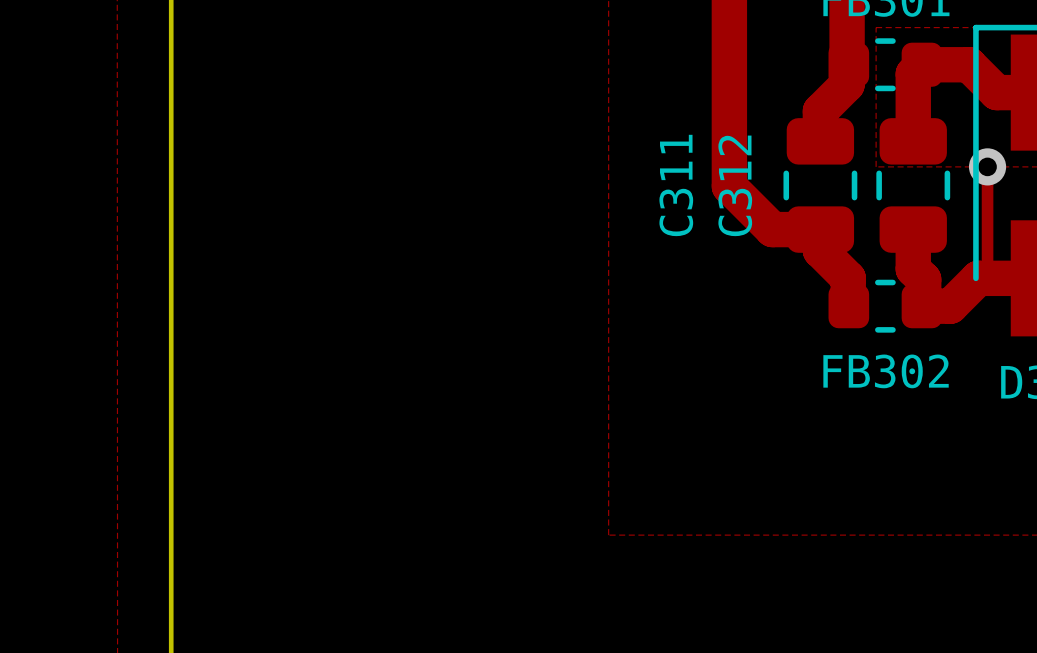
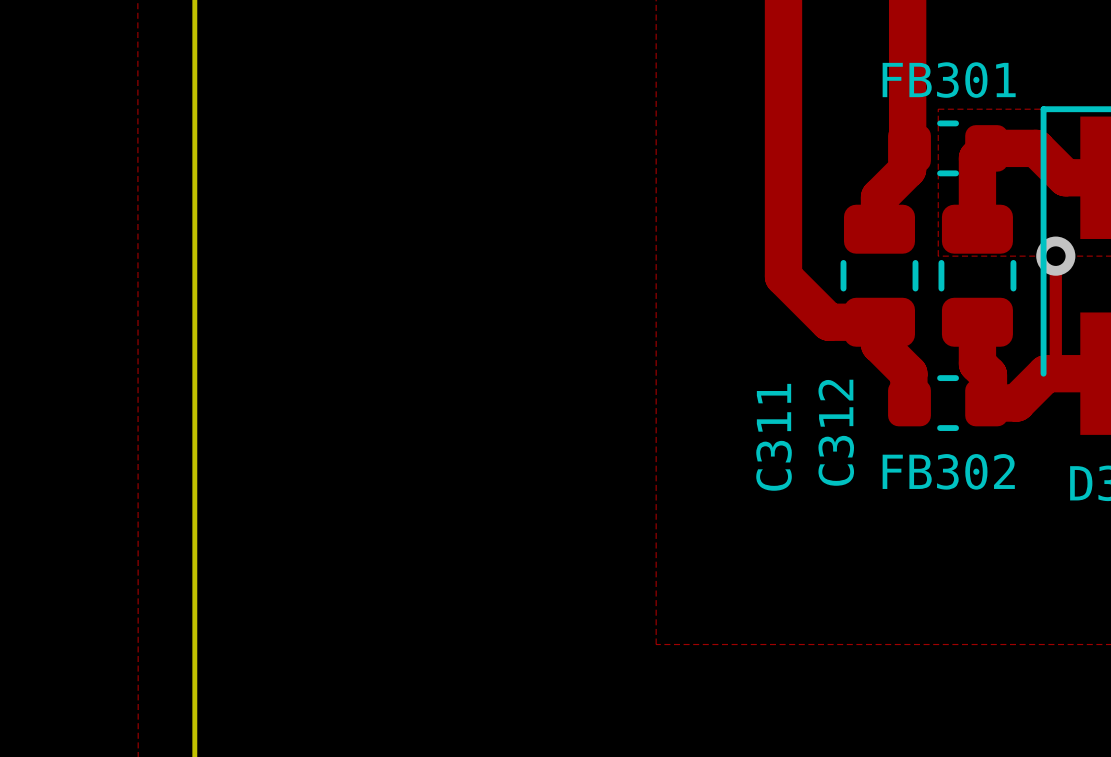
C311 name position: C311 (676, 185) -> C311 (774, 437)
C312 name position: C312 (735, 185) -> C312 (836, 432)

